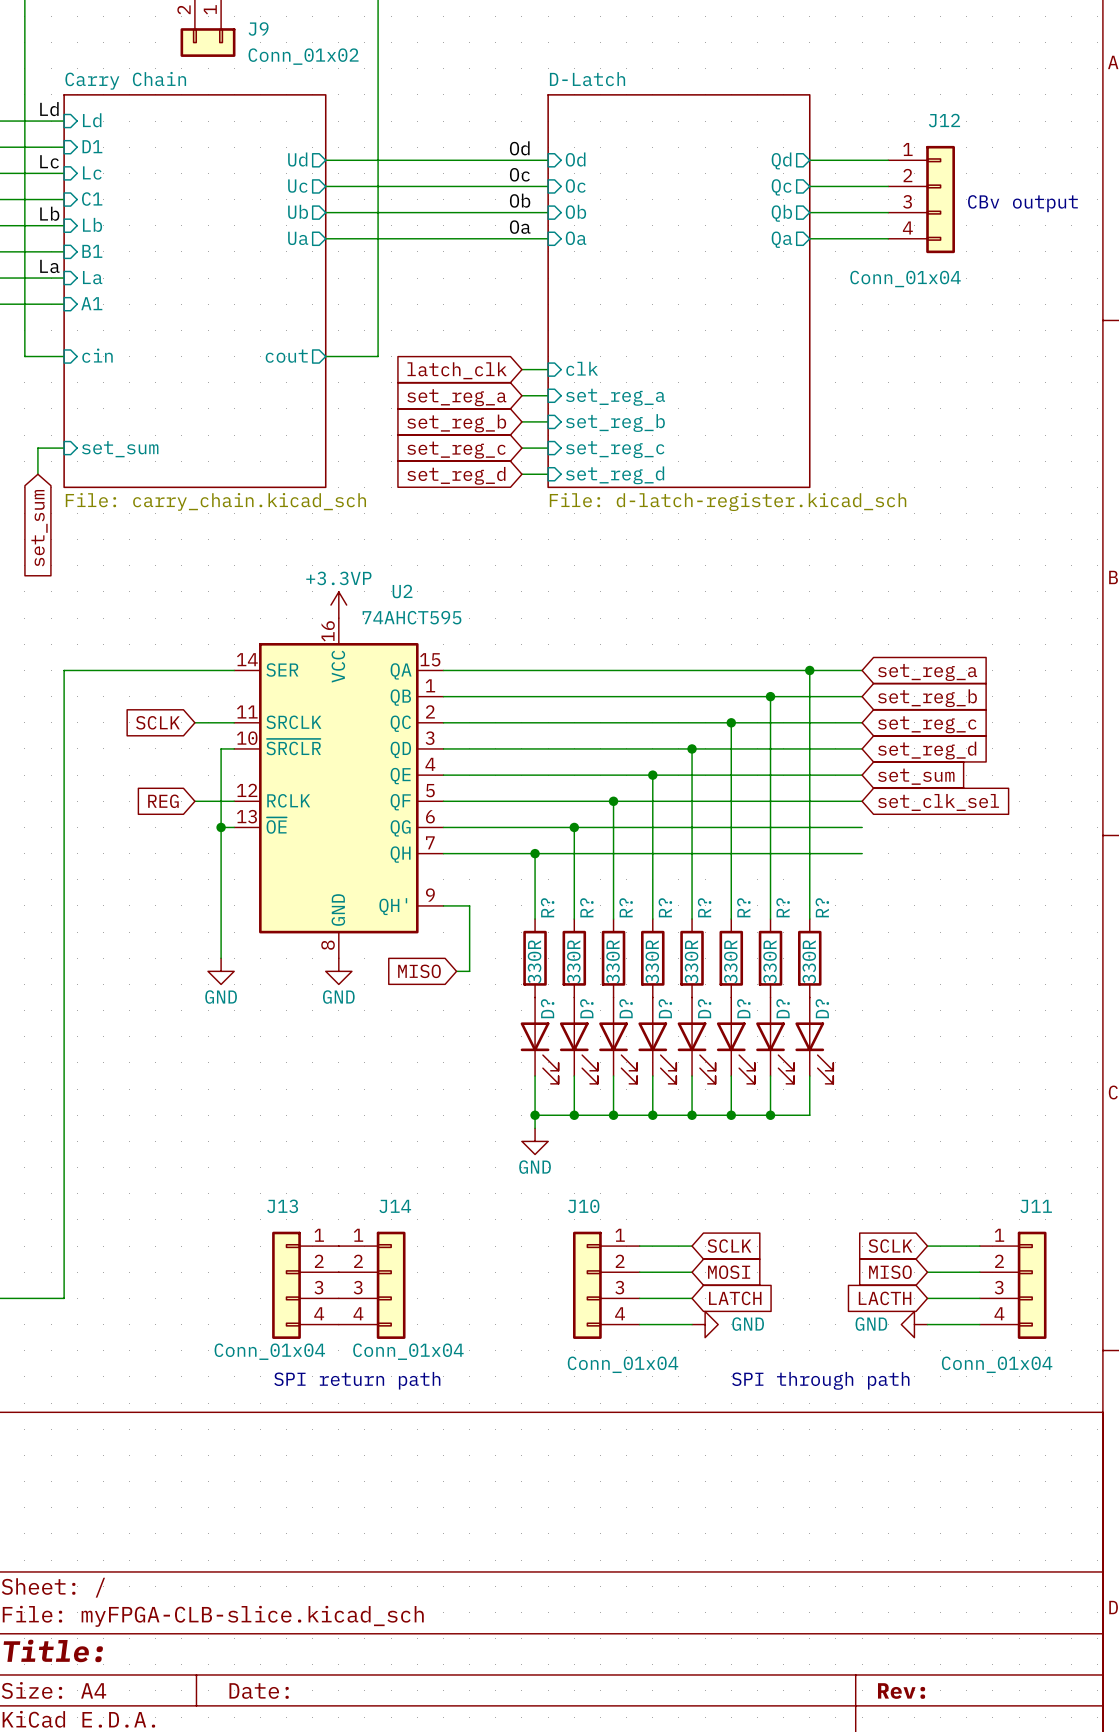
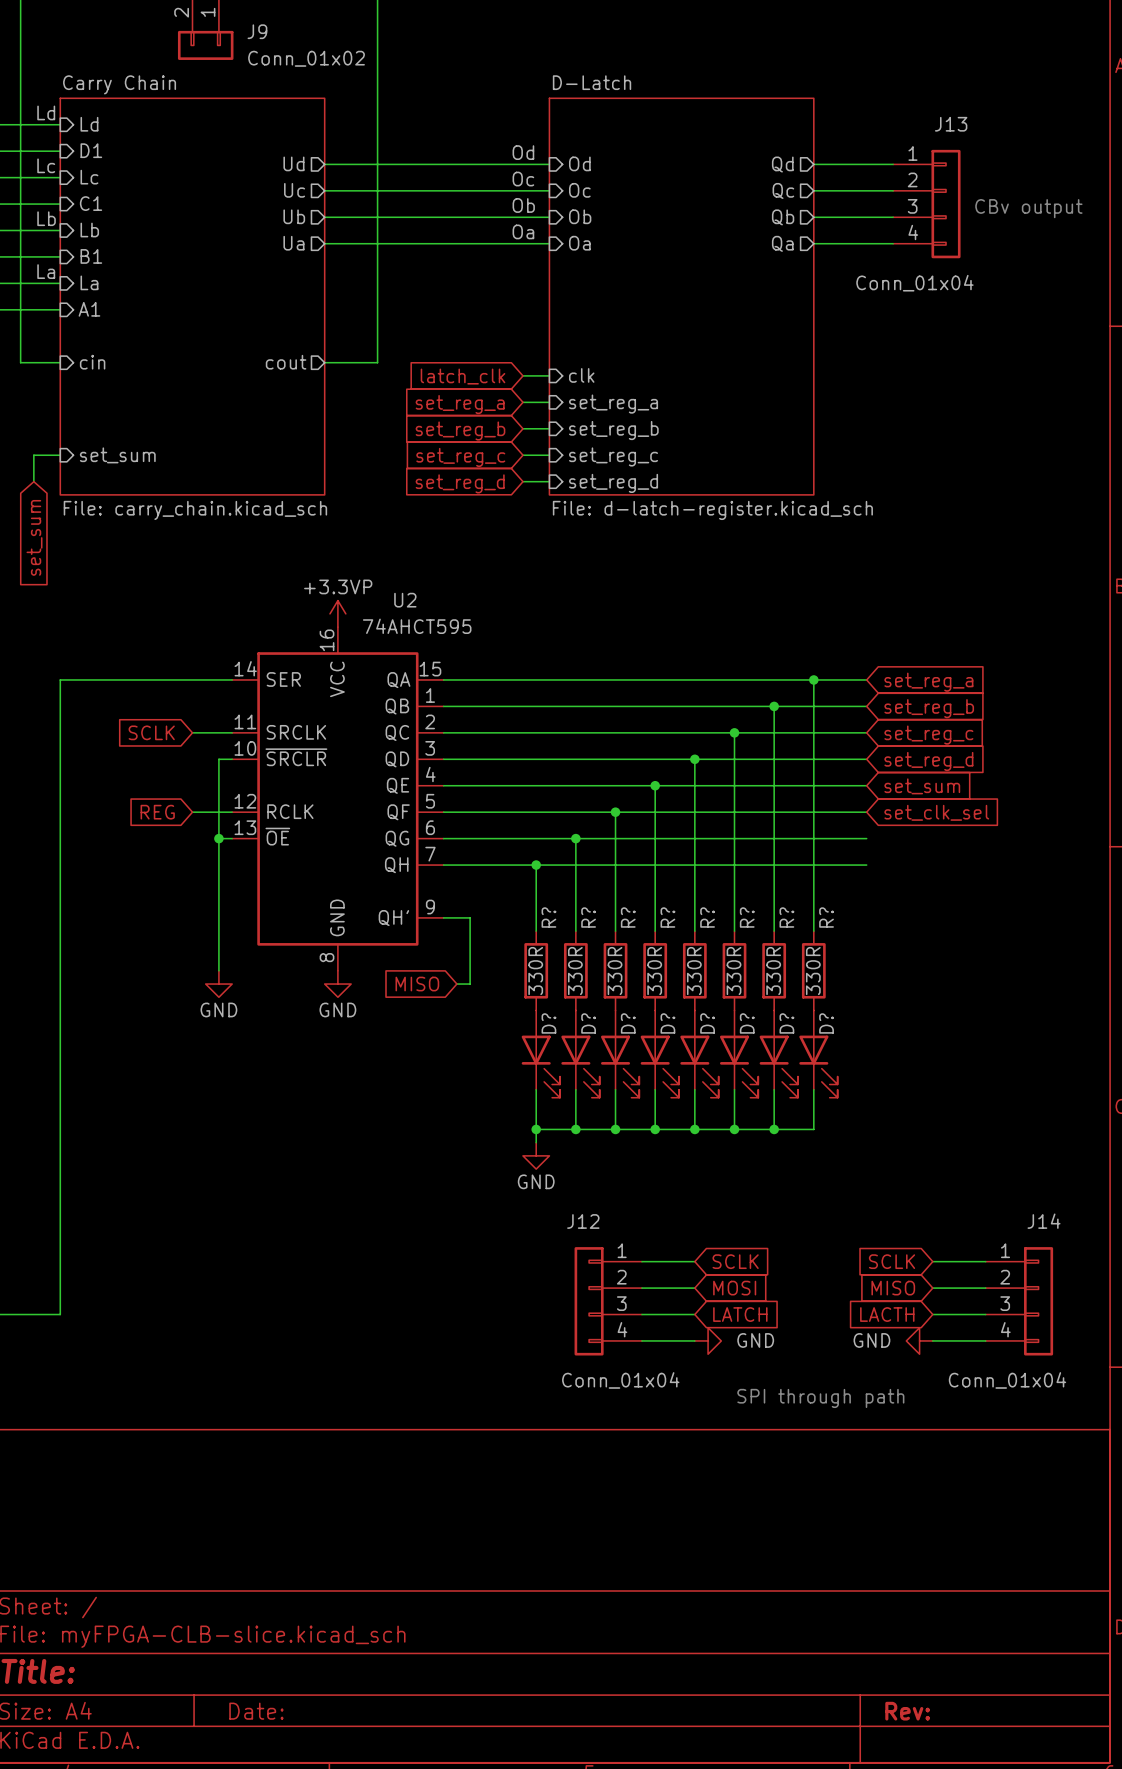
J12 name: J12 (944, 120) -> J13 (951, 124)
J10 name: J10 (583, 1206) -> J12 (583, 1221)
J11 name: J11 (1036, 1206) -> J14 (1044, 1221)
J13: Conn_01x04 (305, 1285) -> none
J14: Conn_01x04 (372, 1285) -> none
text: SPI return path (357, 1380) -> none

